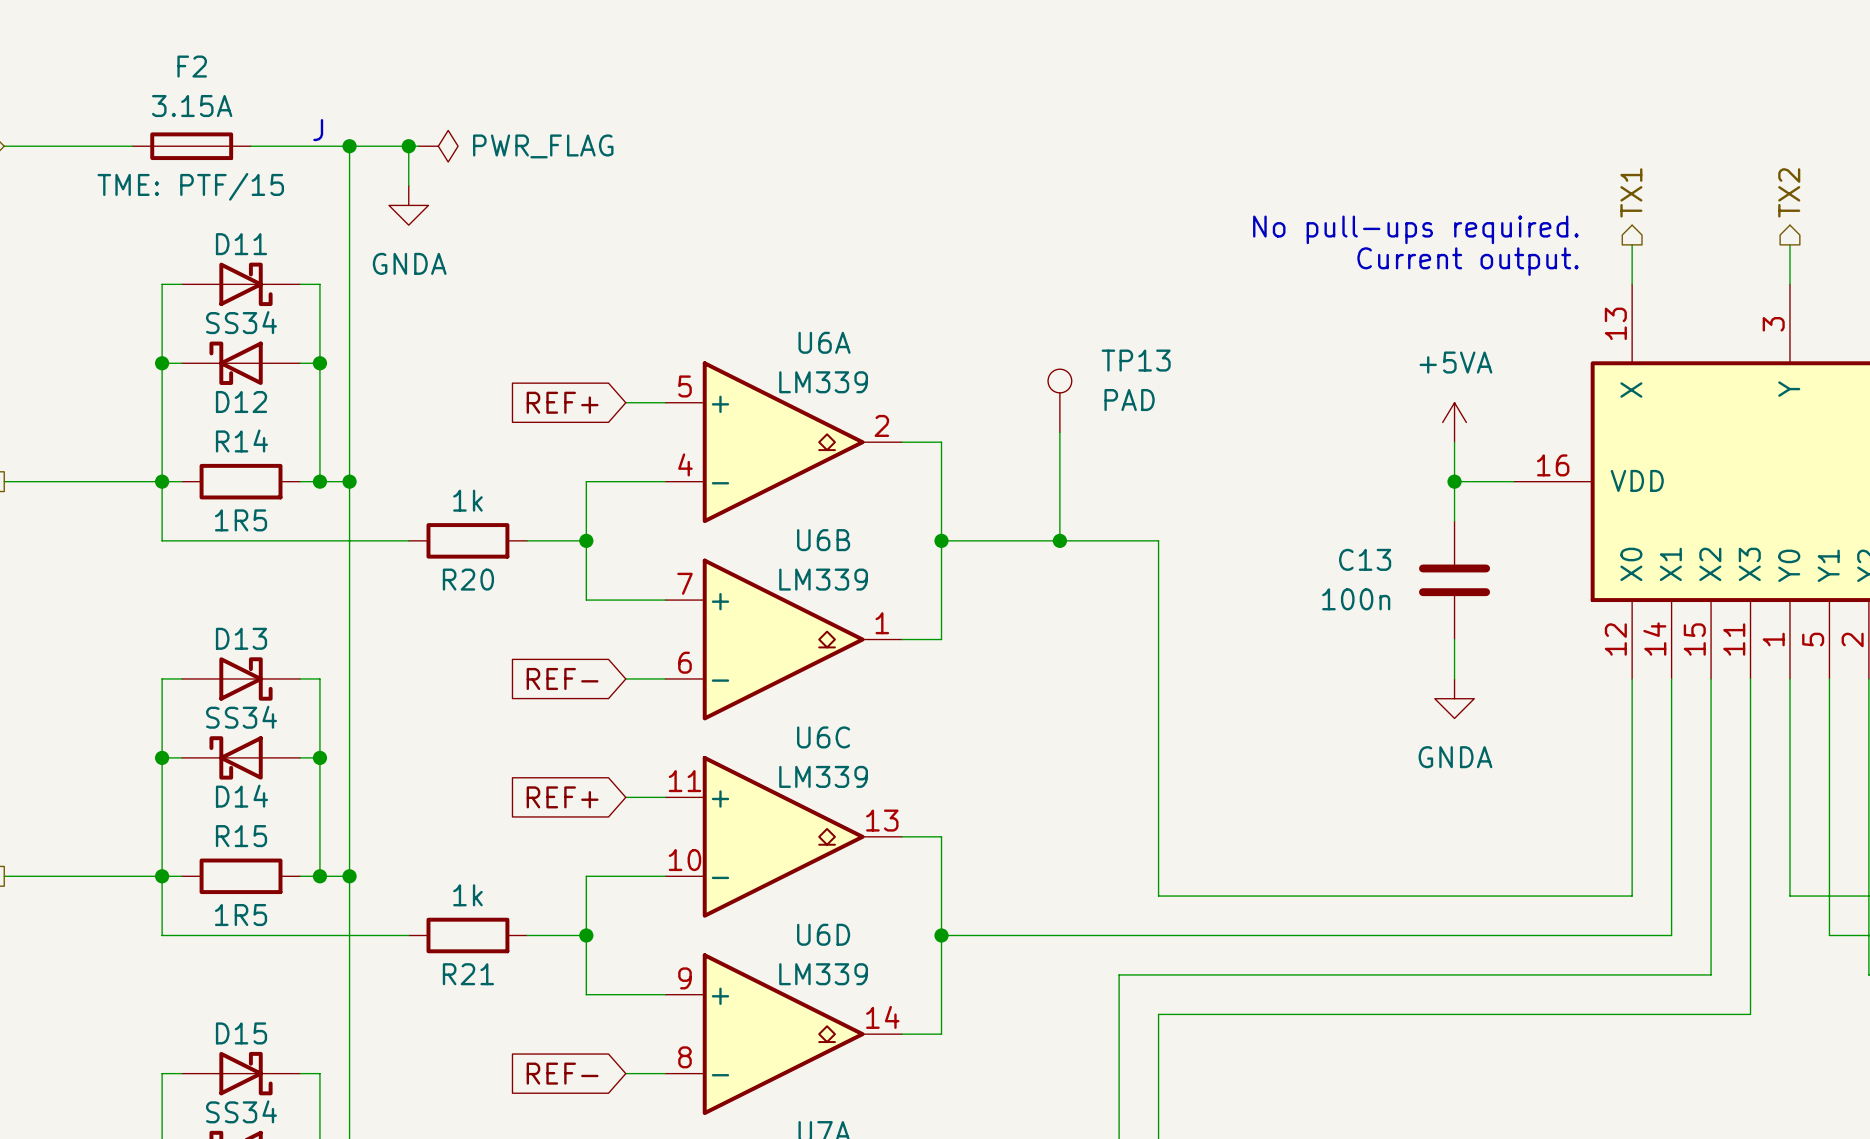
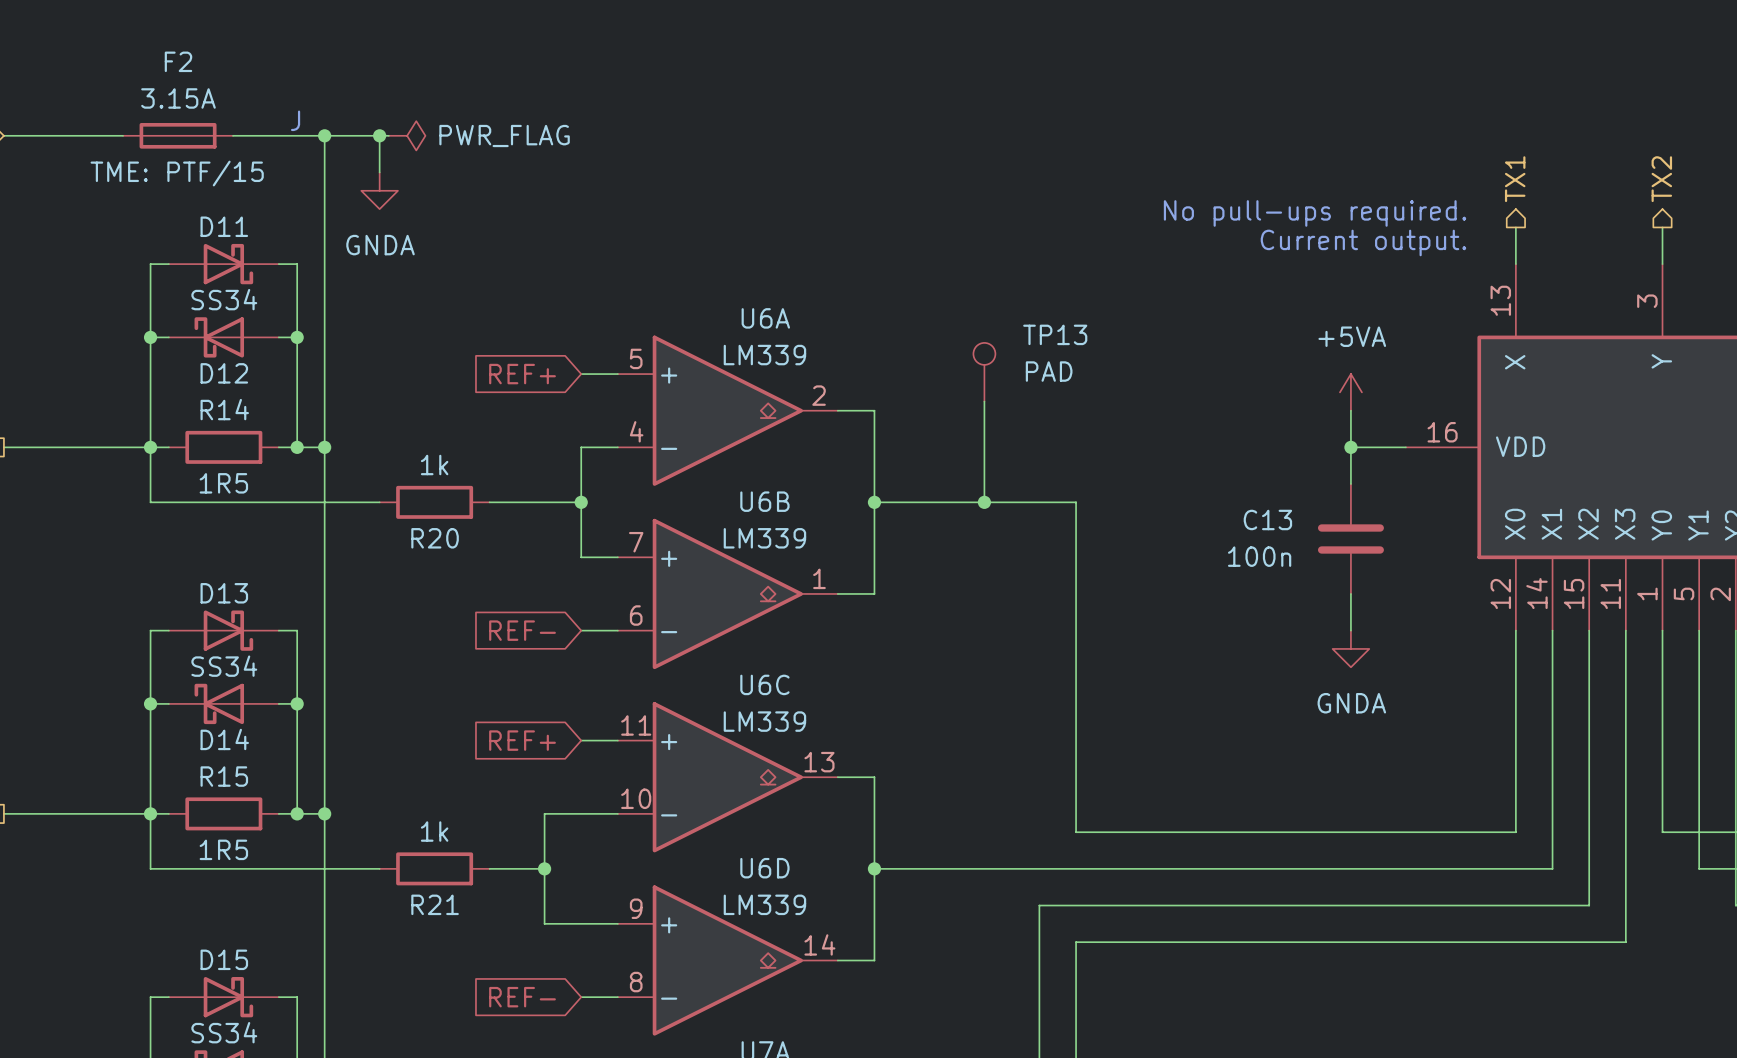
wire: (625, 481) (586, 481) (586, 600) (625, 600) -> (581, 447) (581, 557)
wire: none -> (544, 502) (581, 502)
junction position: (586, 540) -> (581, 502)

